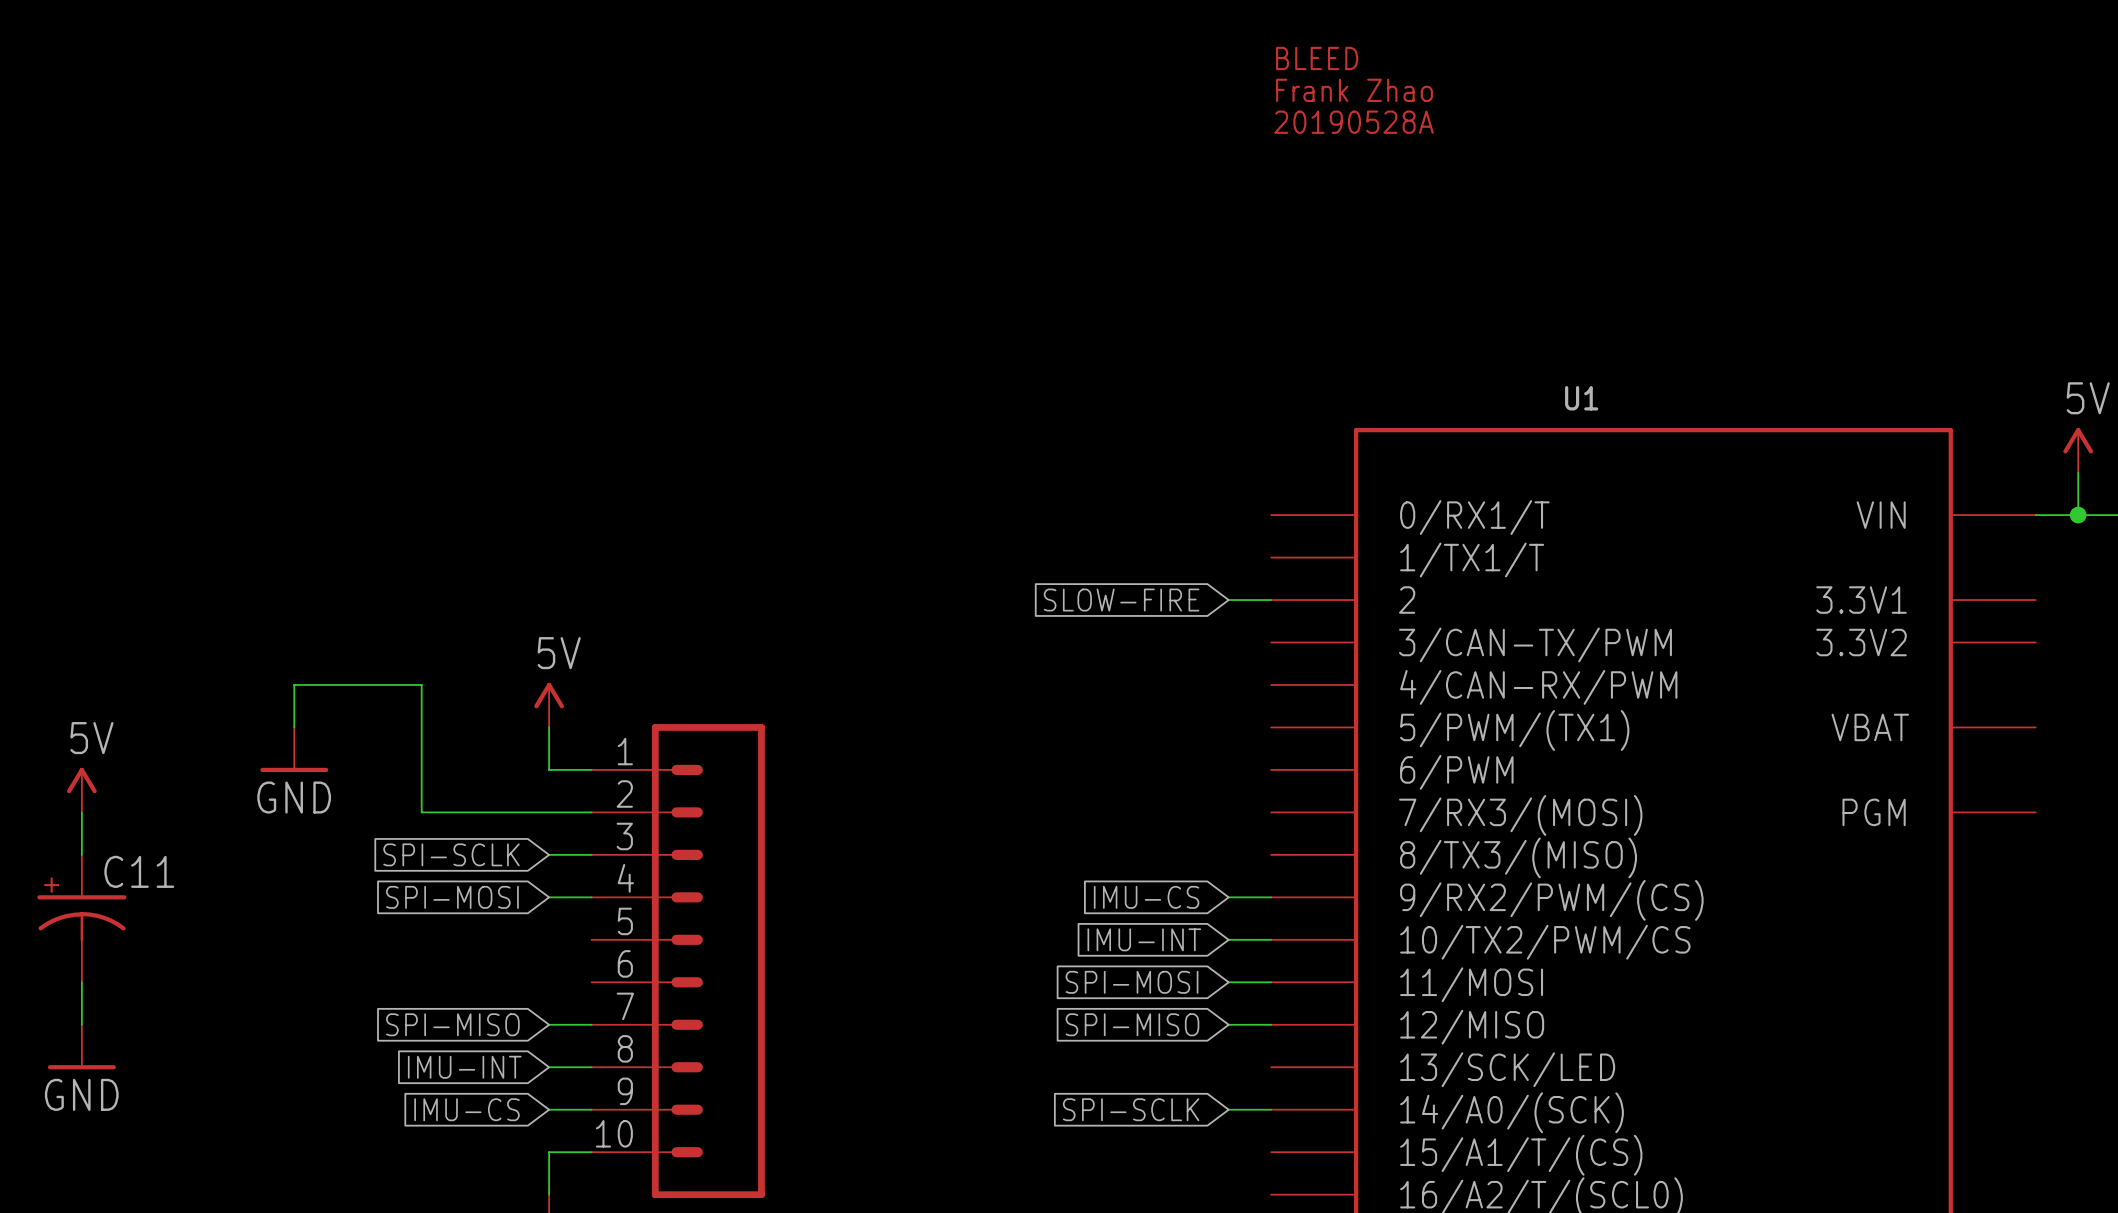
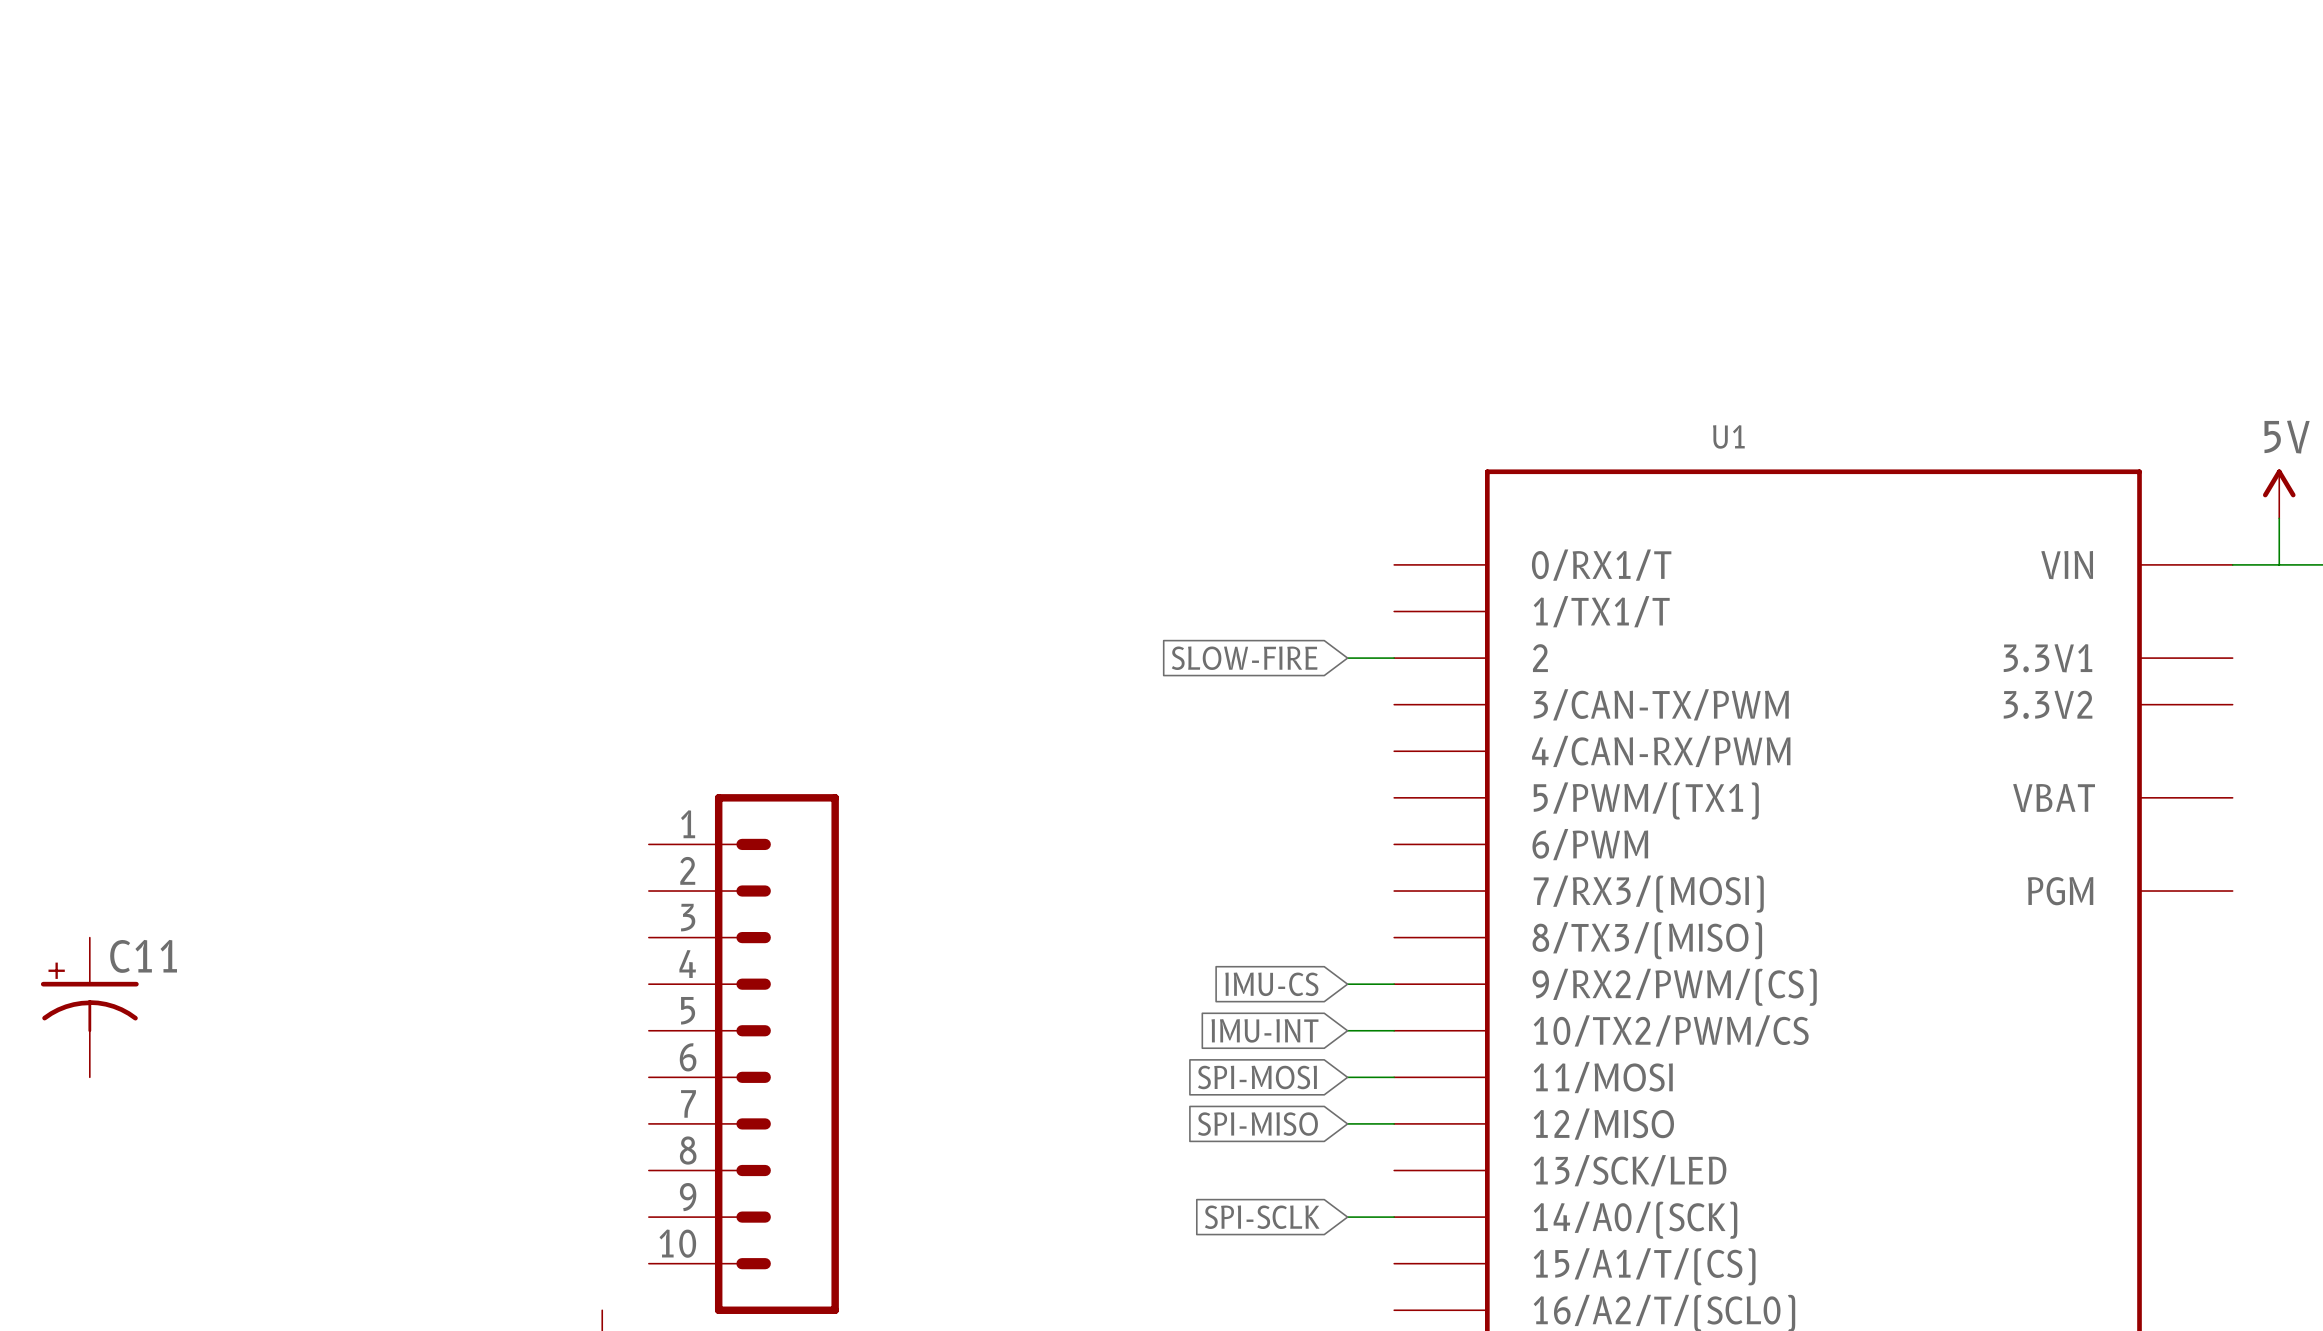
part: (1354, 90) -> none
junction: (2078, 515) -> none
power symbol: 5V (549, 705) -> none
wire: (294, 727) (294, 684) (421, 684) (421, 812) (591, 812) -> none
wire: (549, 727) (549, 769) (591, 769) -> none
power symbol: GND (294, 749) -> none
power symbol: 5V (81, 790) -> none
wire: (81, 812) (81, 854) -> none
global label: SPI-SCLK (451, 854) -> none
wire: (549, 854) (591, 854) -> none
global label: SPI-MOSI (452, 897) -> none
wire: (549, 897) (591, 897) -> none
wire: (81, 982) (81, 1024) -> none
global label: SPI-MISO (452, 1024) -> none
wire: (549, 1024) (591, 1024) -> none
power symbol: GND (81, 1047) -> none
global label: IMU-INT (464, 1067) -> none
wire: (549, 1067) (591, 1067) -> none
global label: IMU-CS (466, 1109) -> none
wire: (549, 1109) (591, 1109) -> none
wire: (591, 1152) (549, 1152) (549, 1194) -> none

